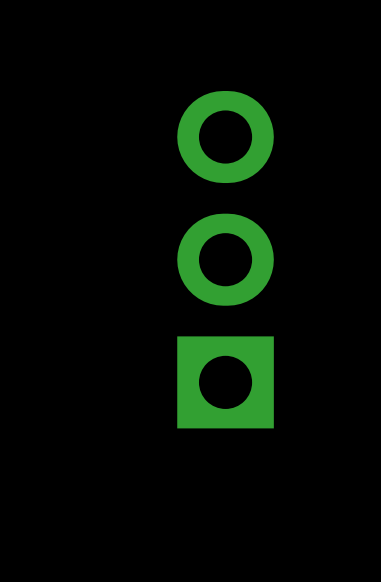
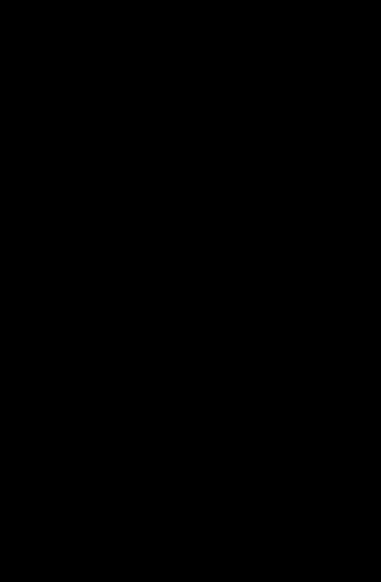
part: (225, 259) -> none

